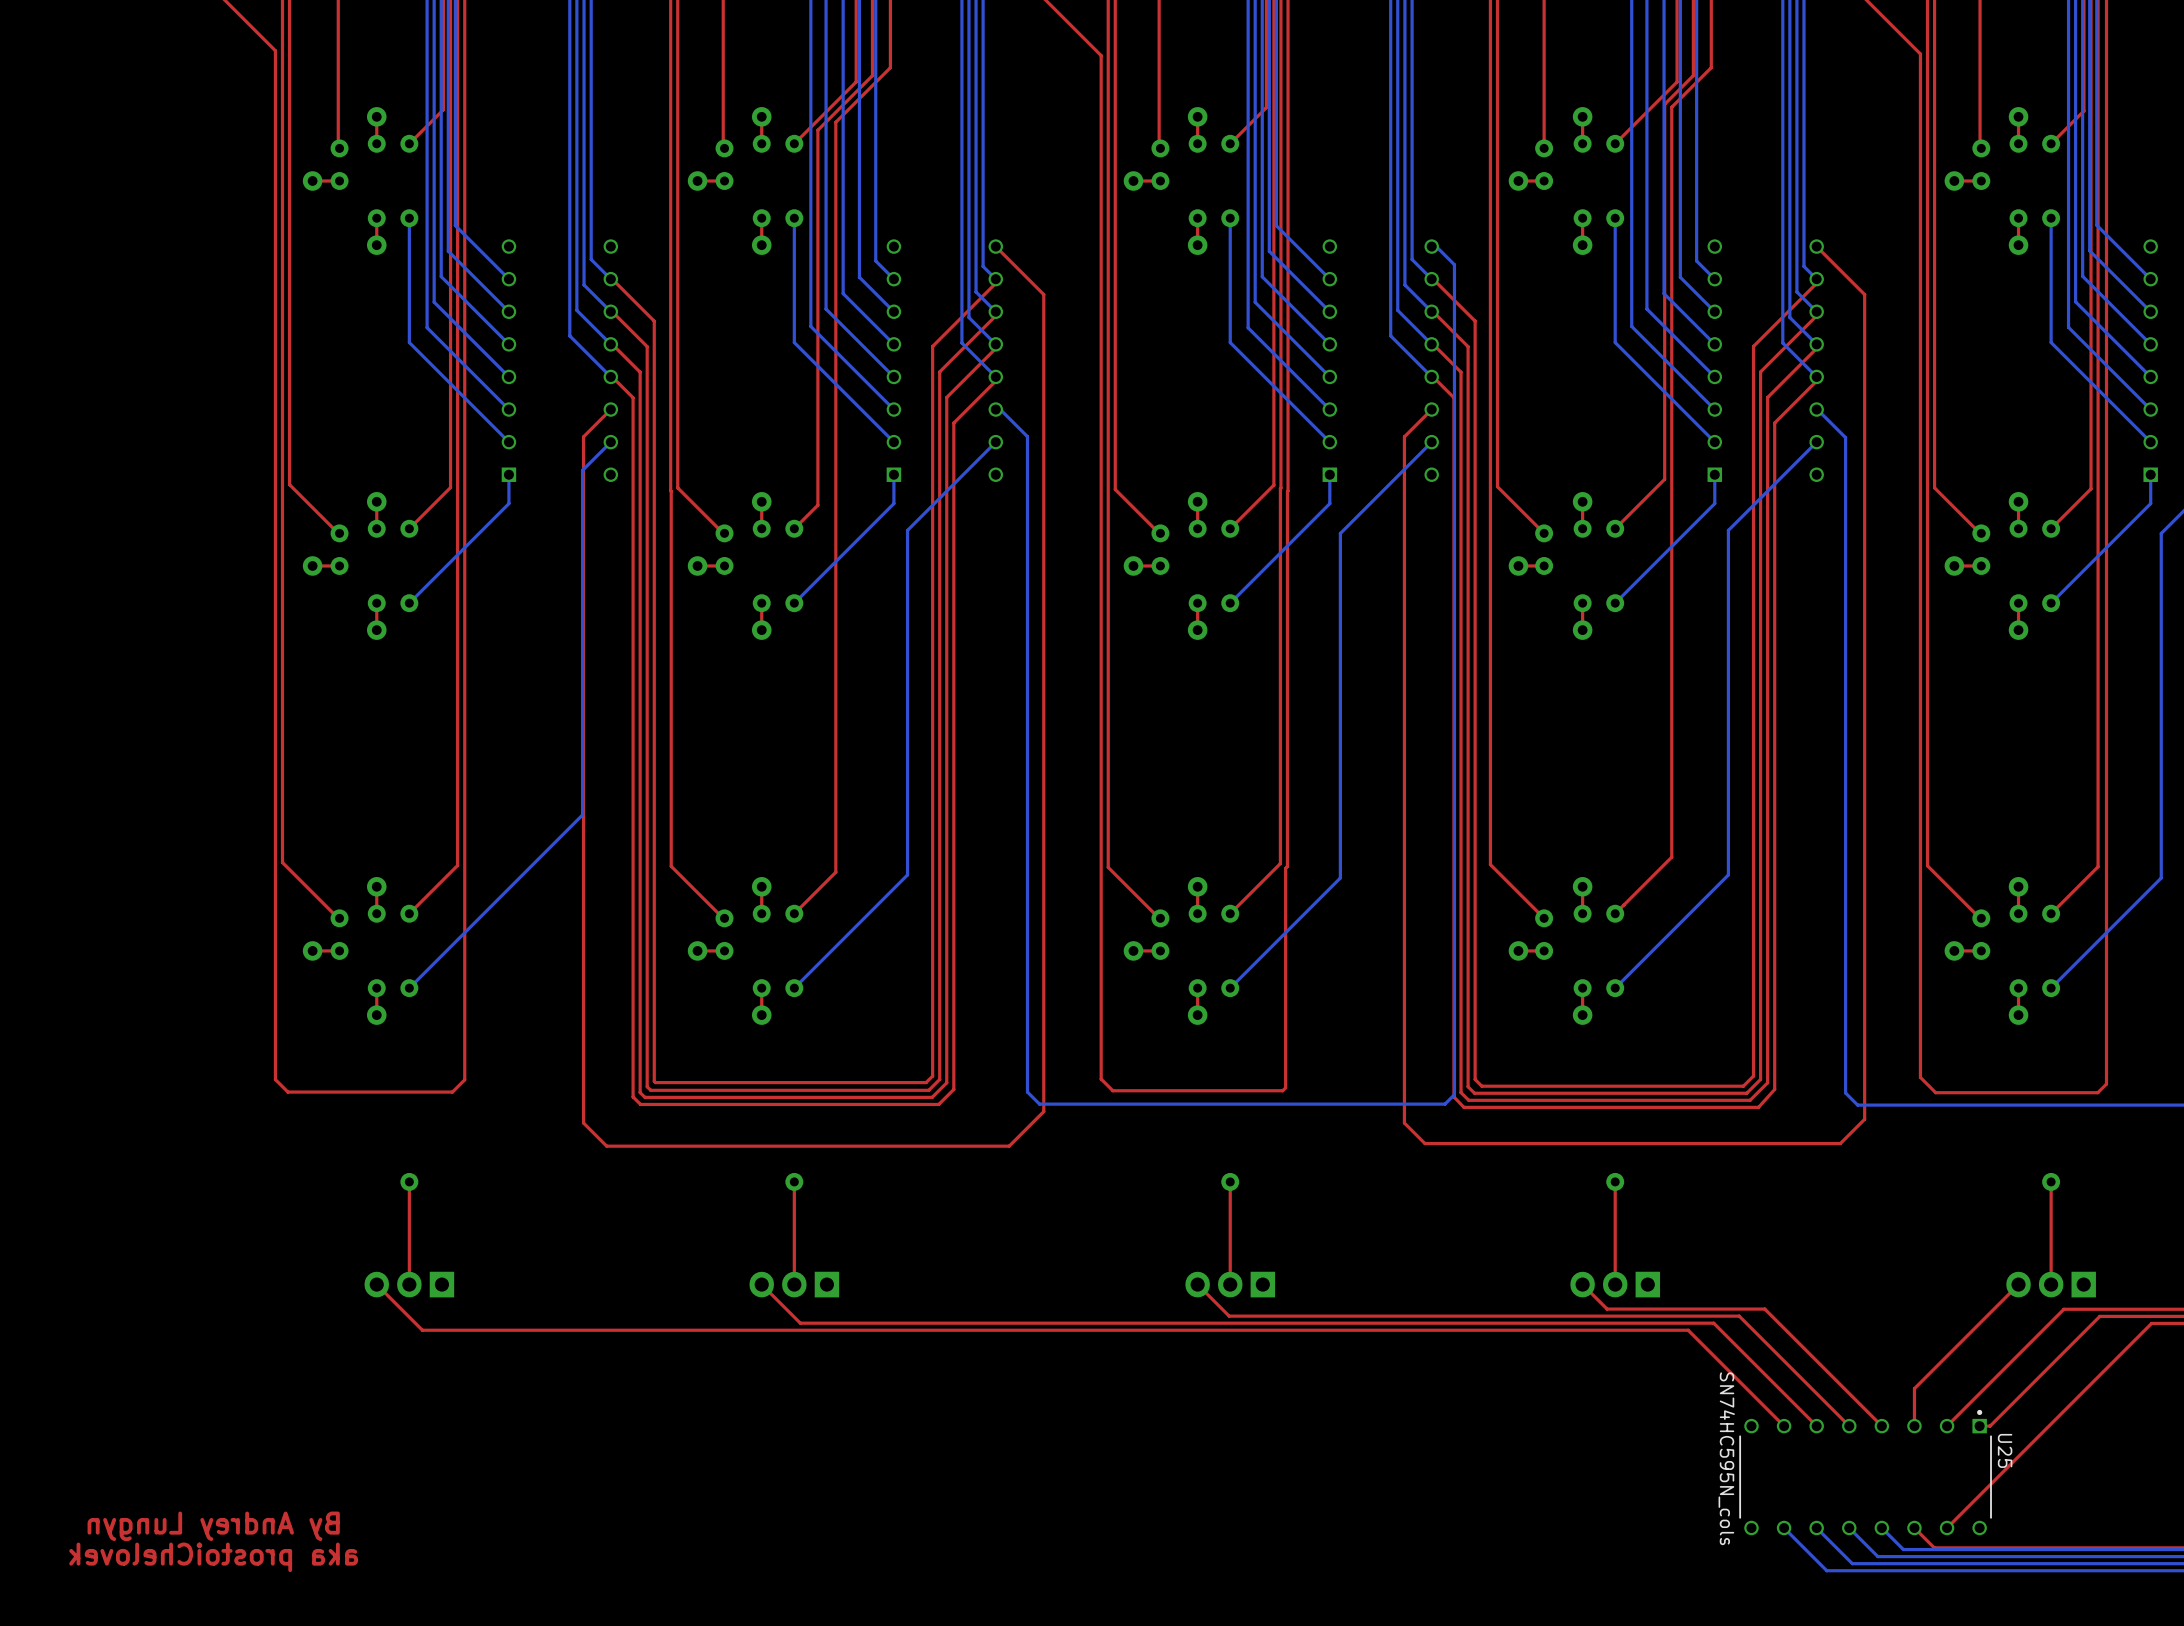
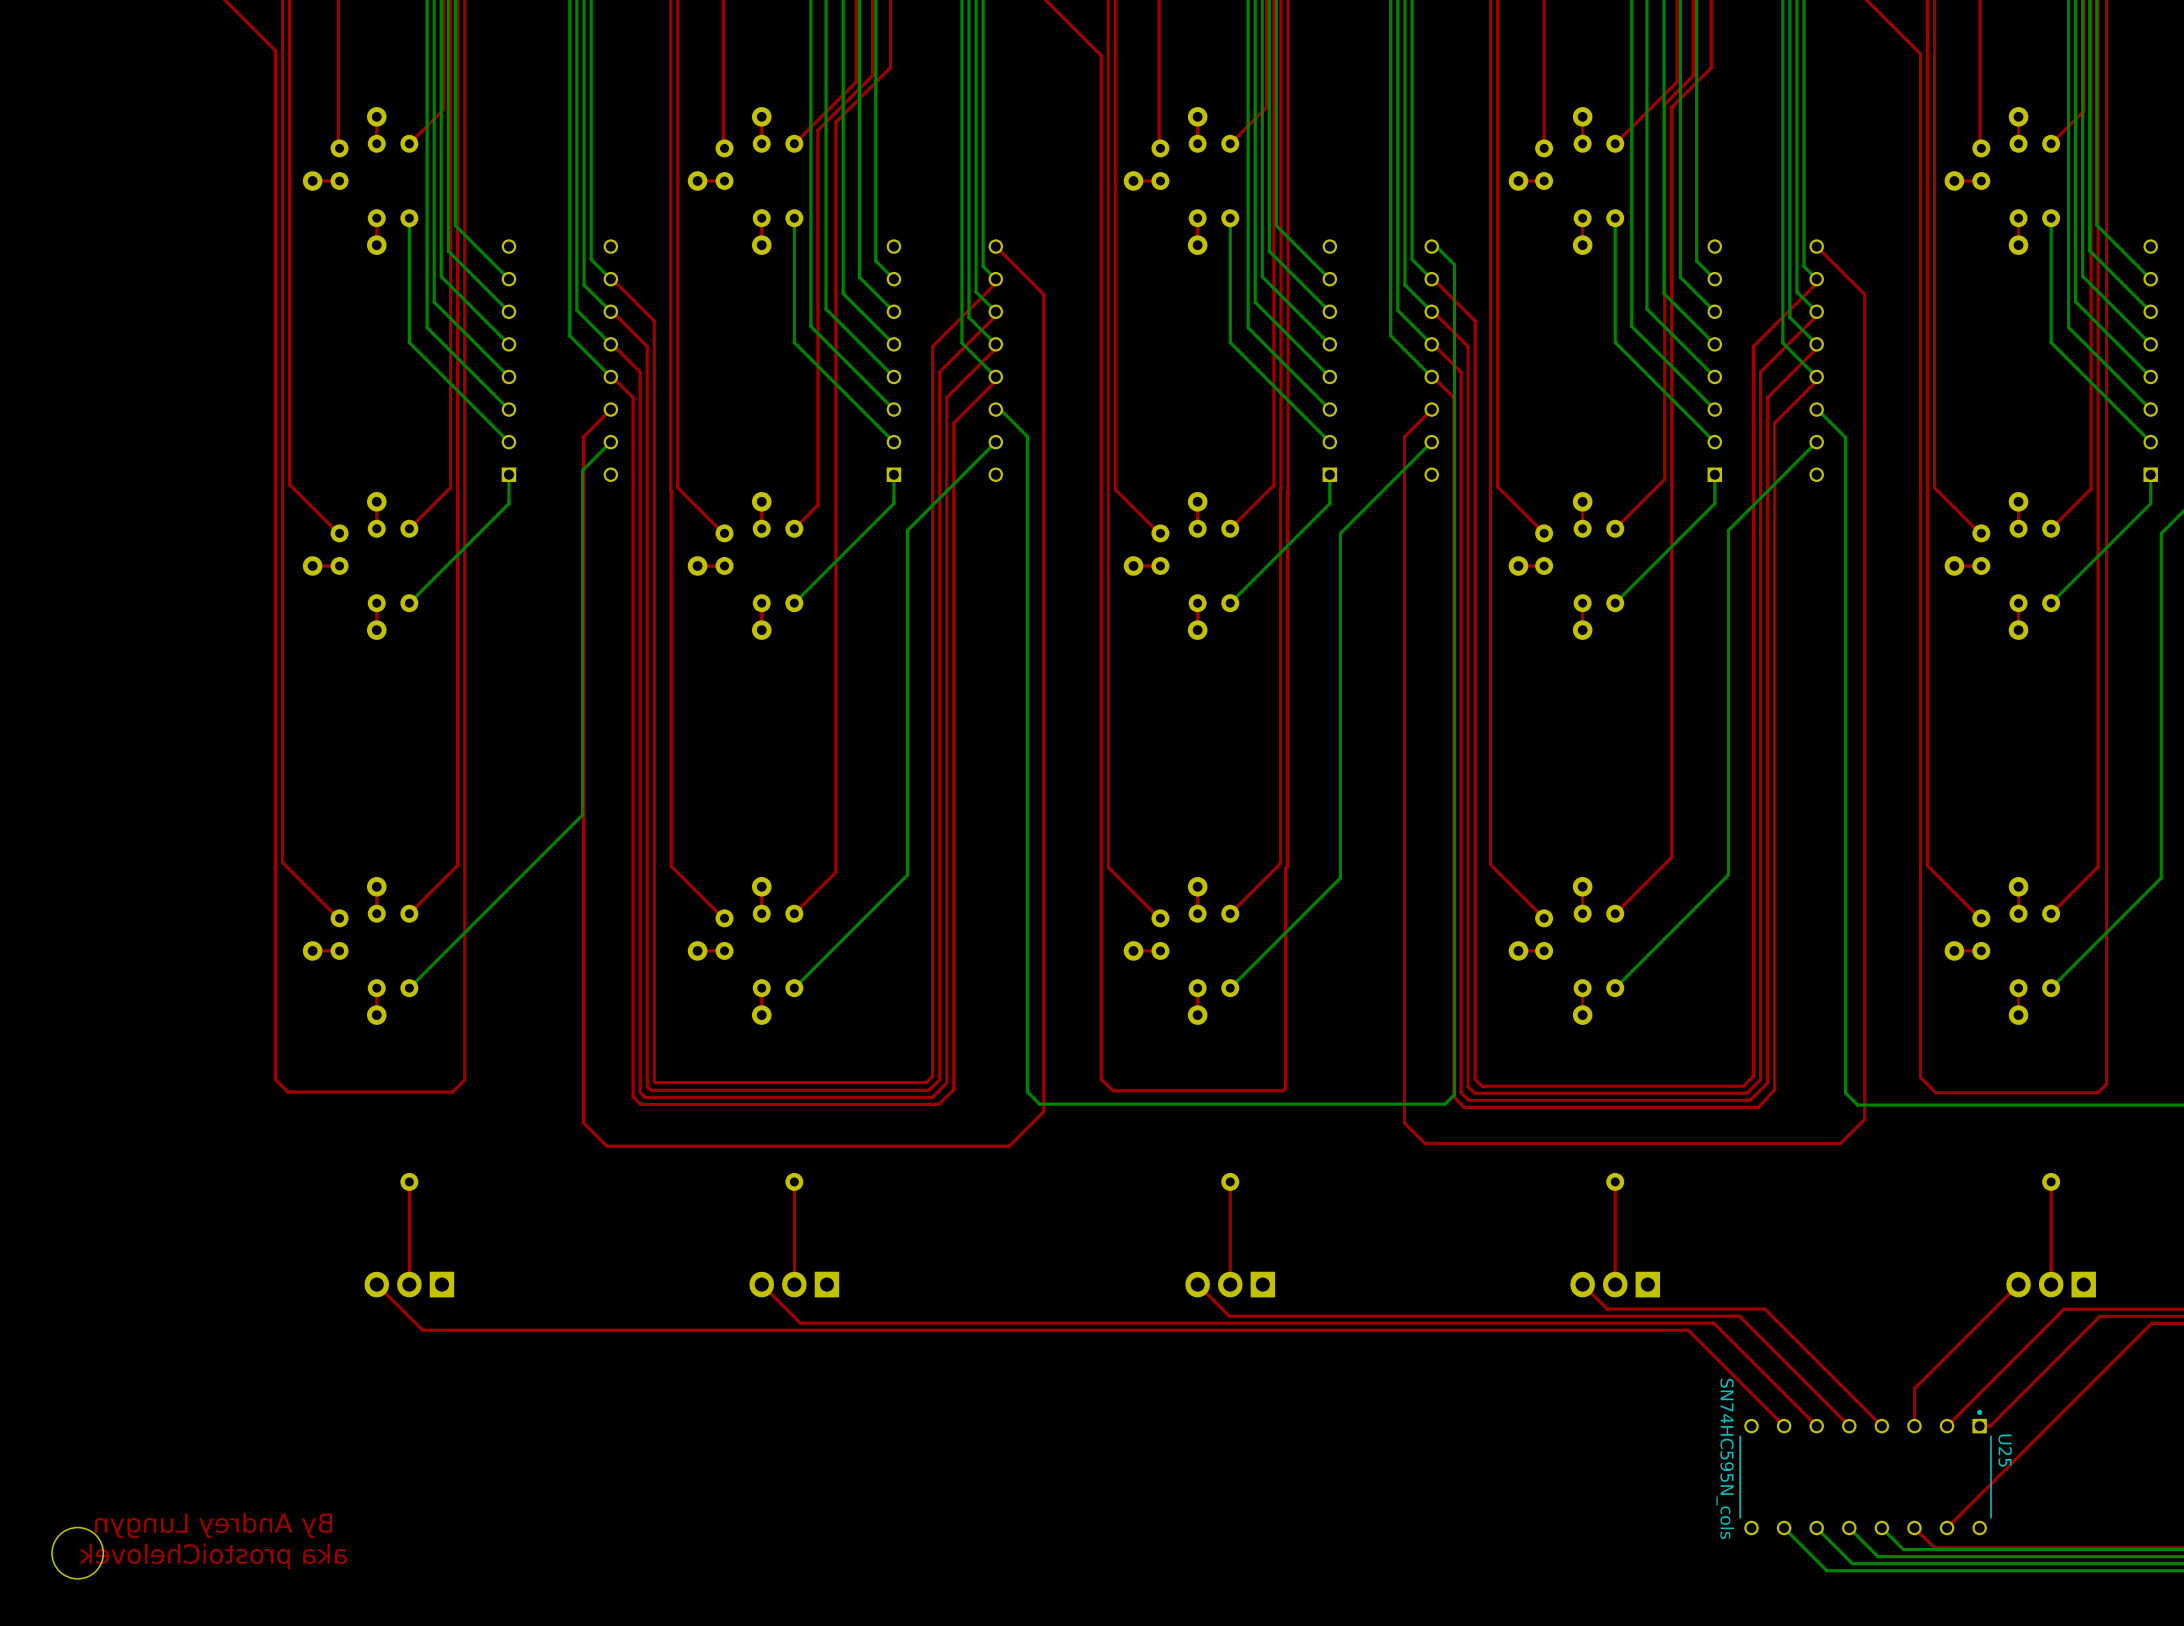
round board edge: none -> [51, 1527, 104, 1580]

